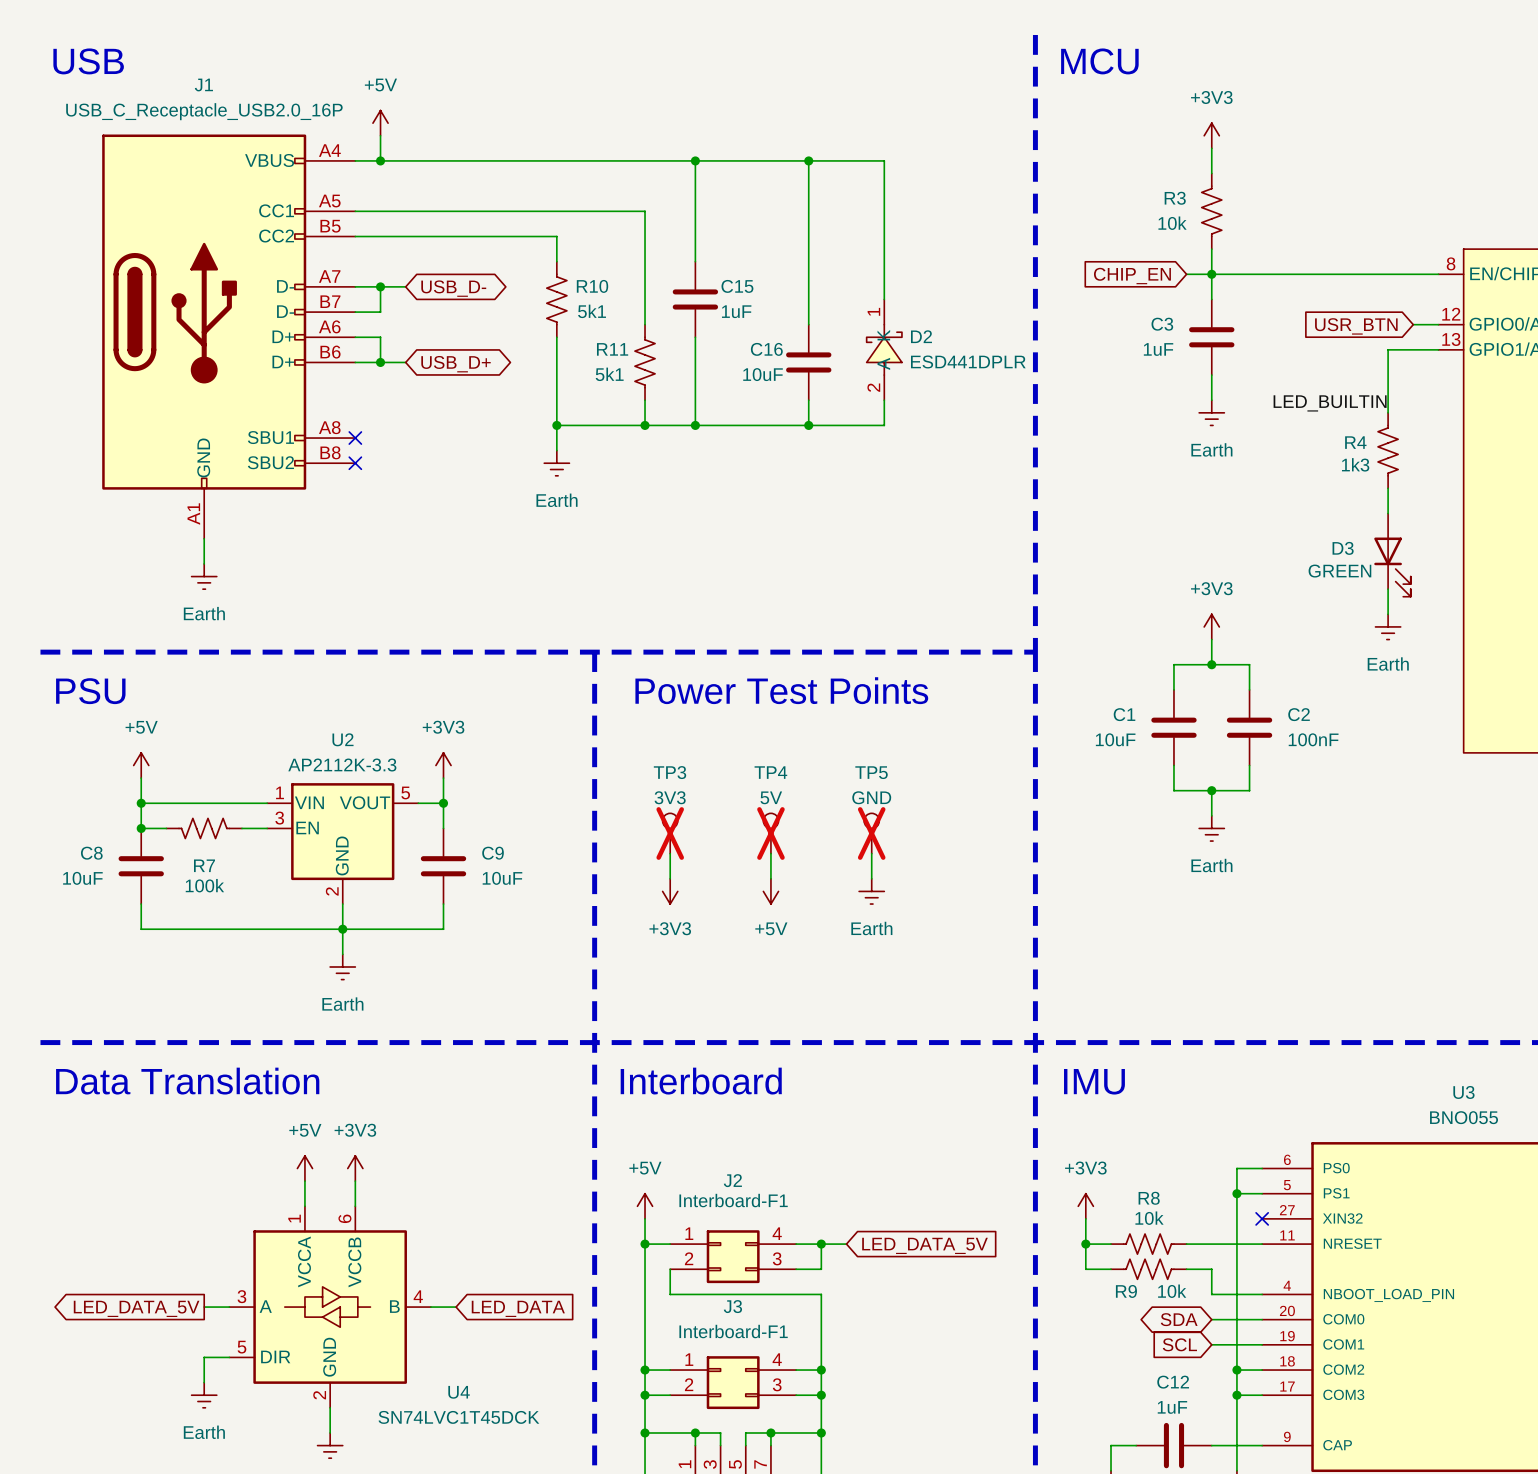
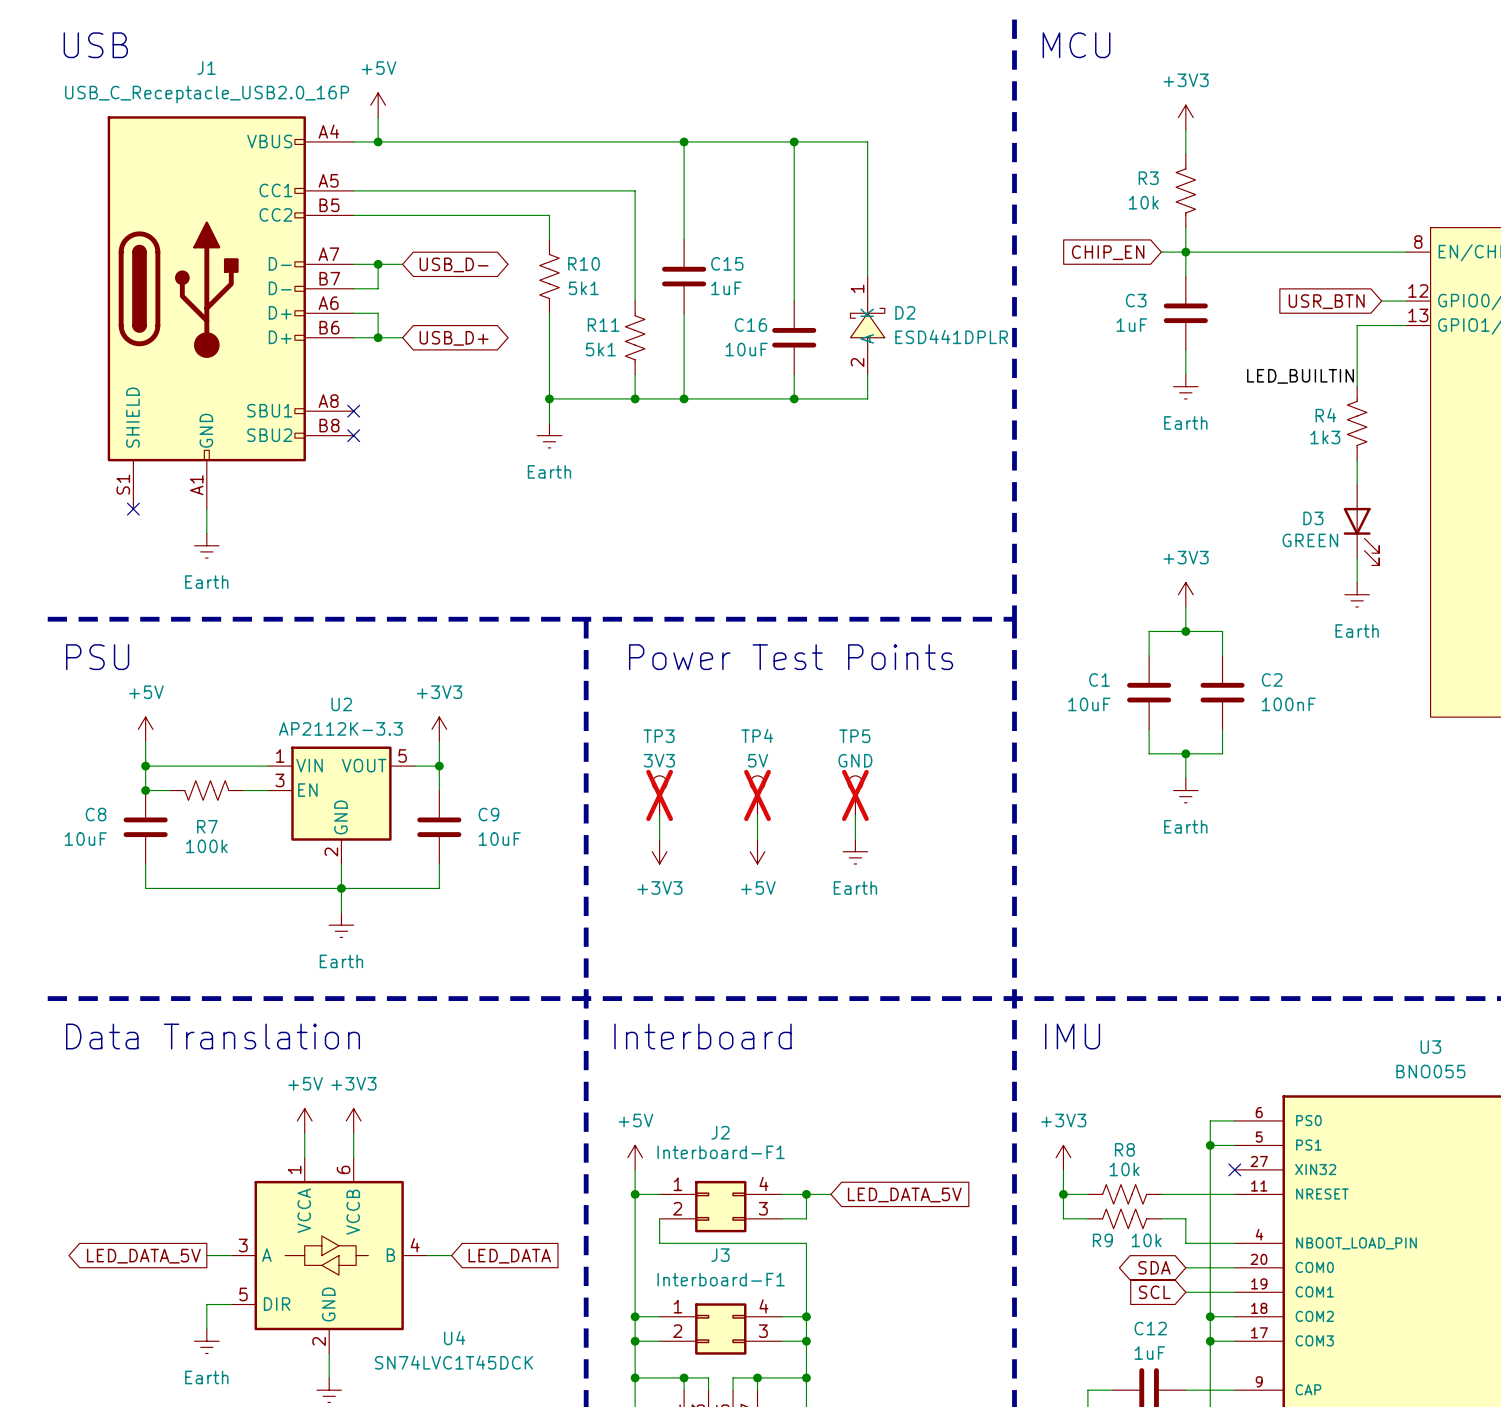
J1 symbol: [102, 134, 356, 539] -> [107, 116, 354, 510]
no-connect mark: none -> (133, 509)

